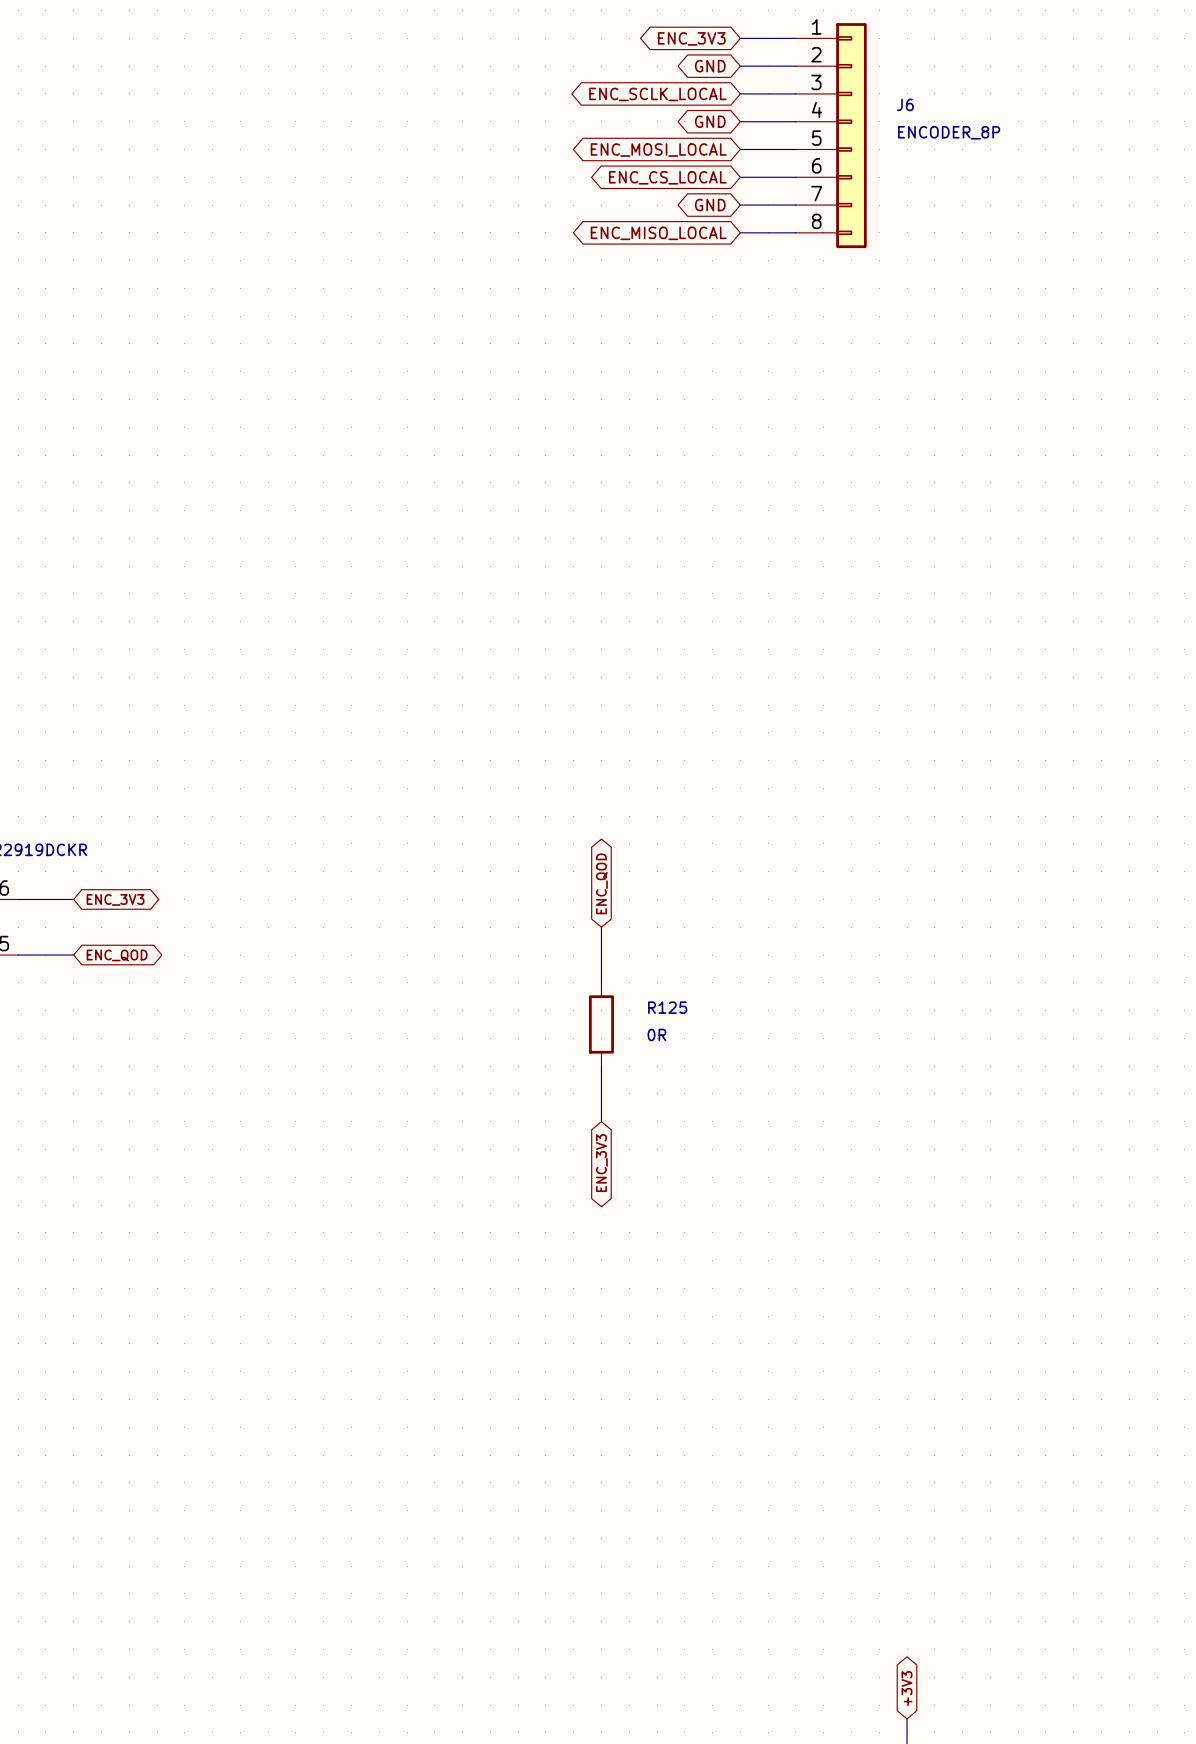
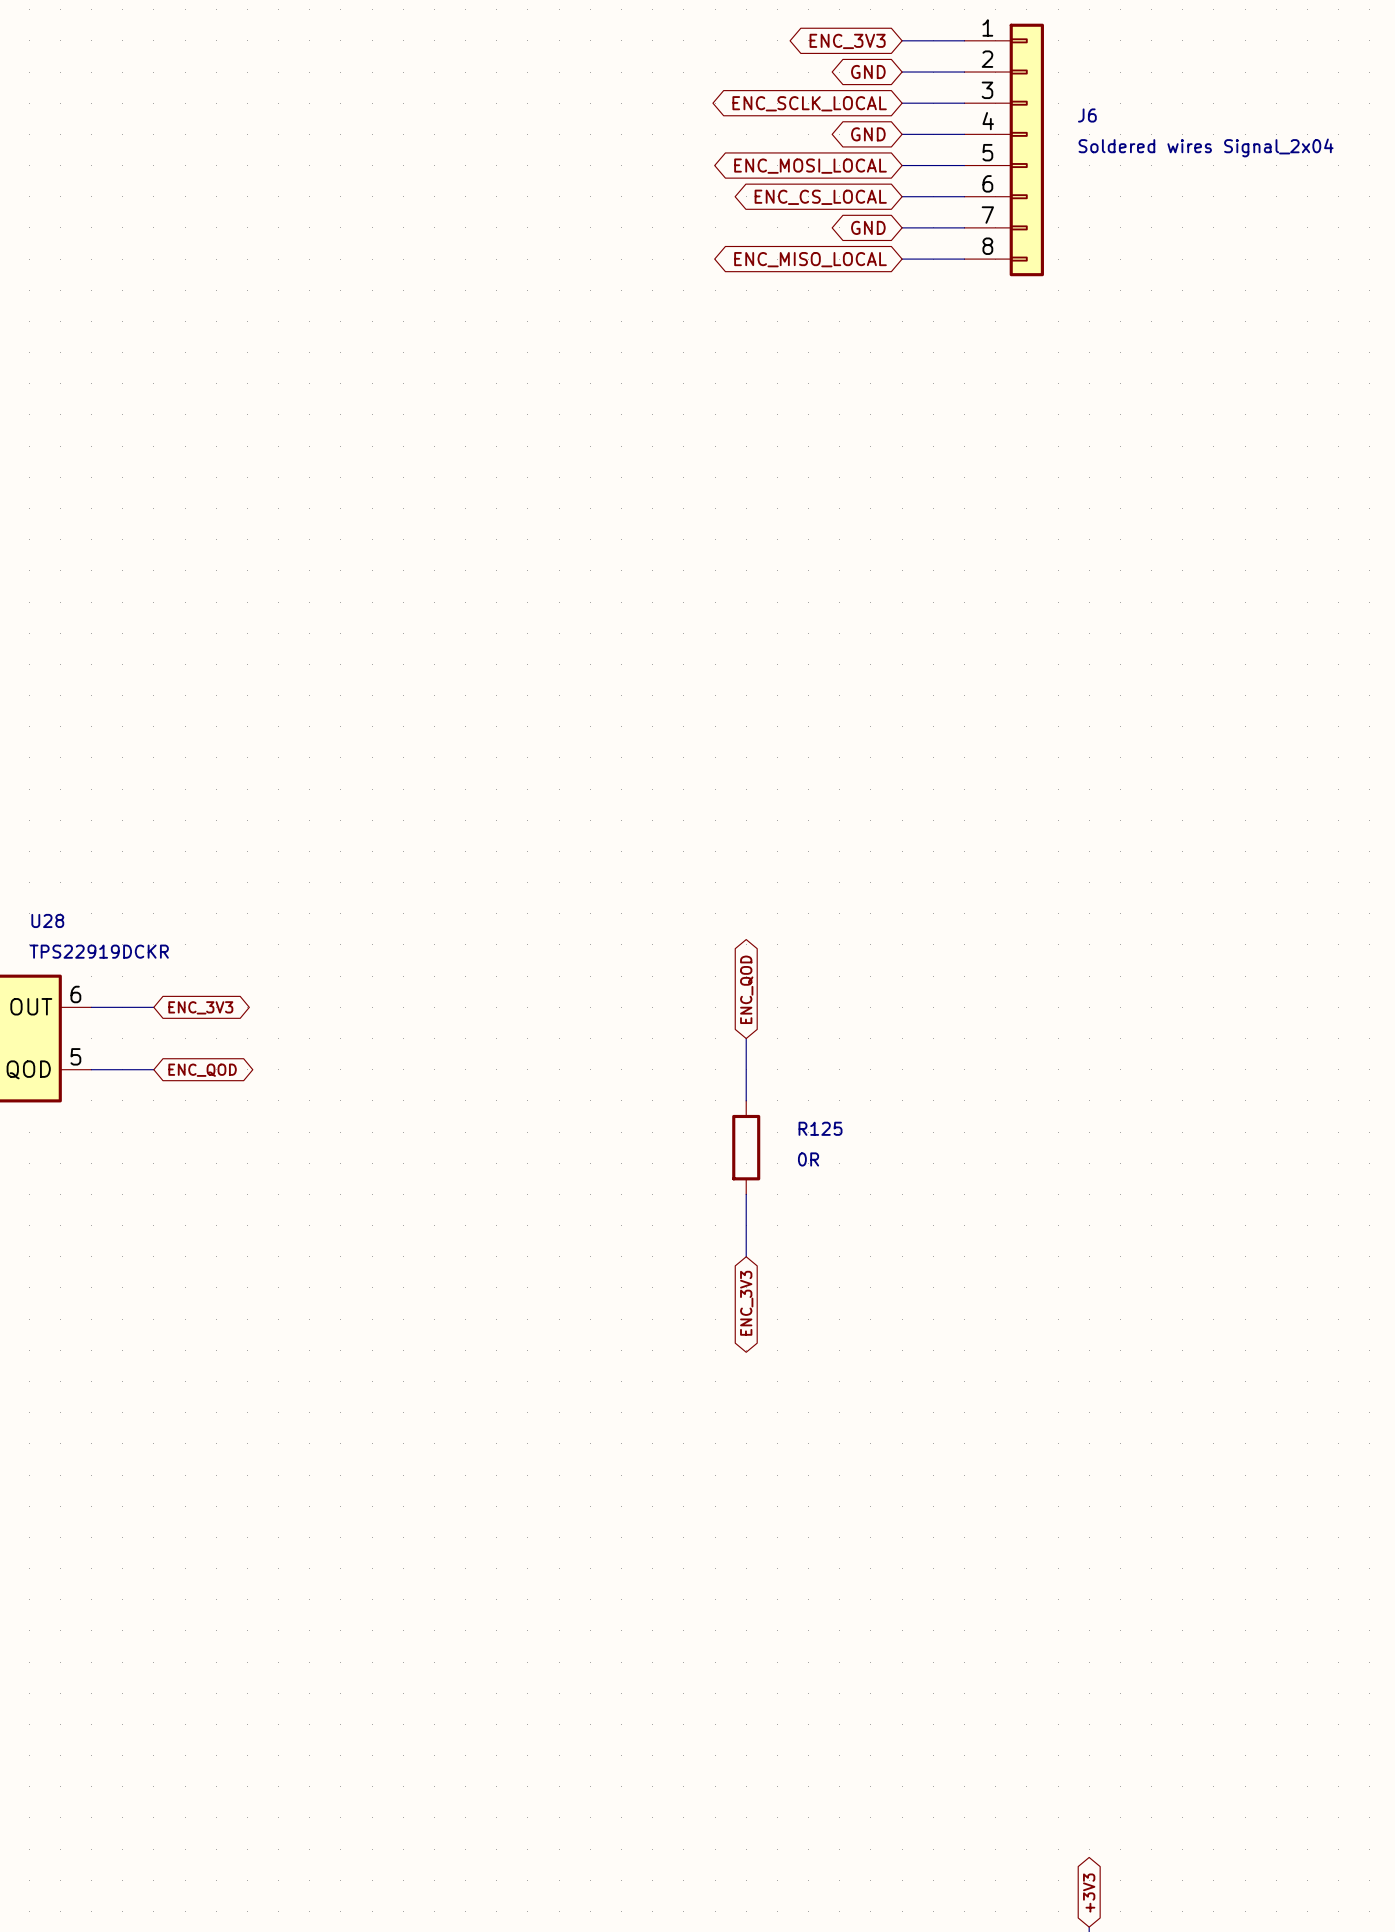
J6 value: ENCODER_8P (949, 132) -> Soldered wires Signal_2x04 (1206, 147)

